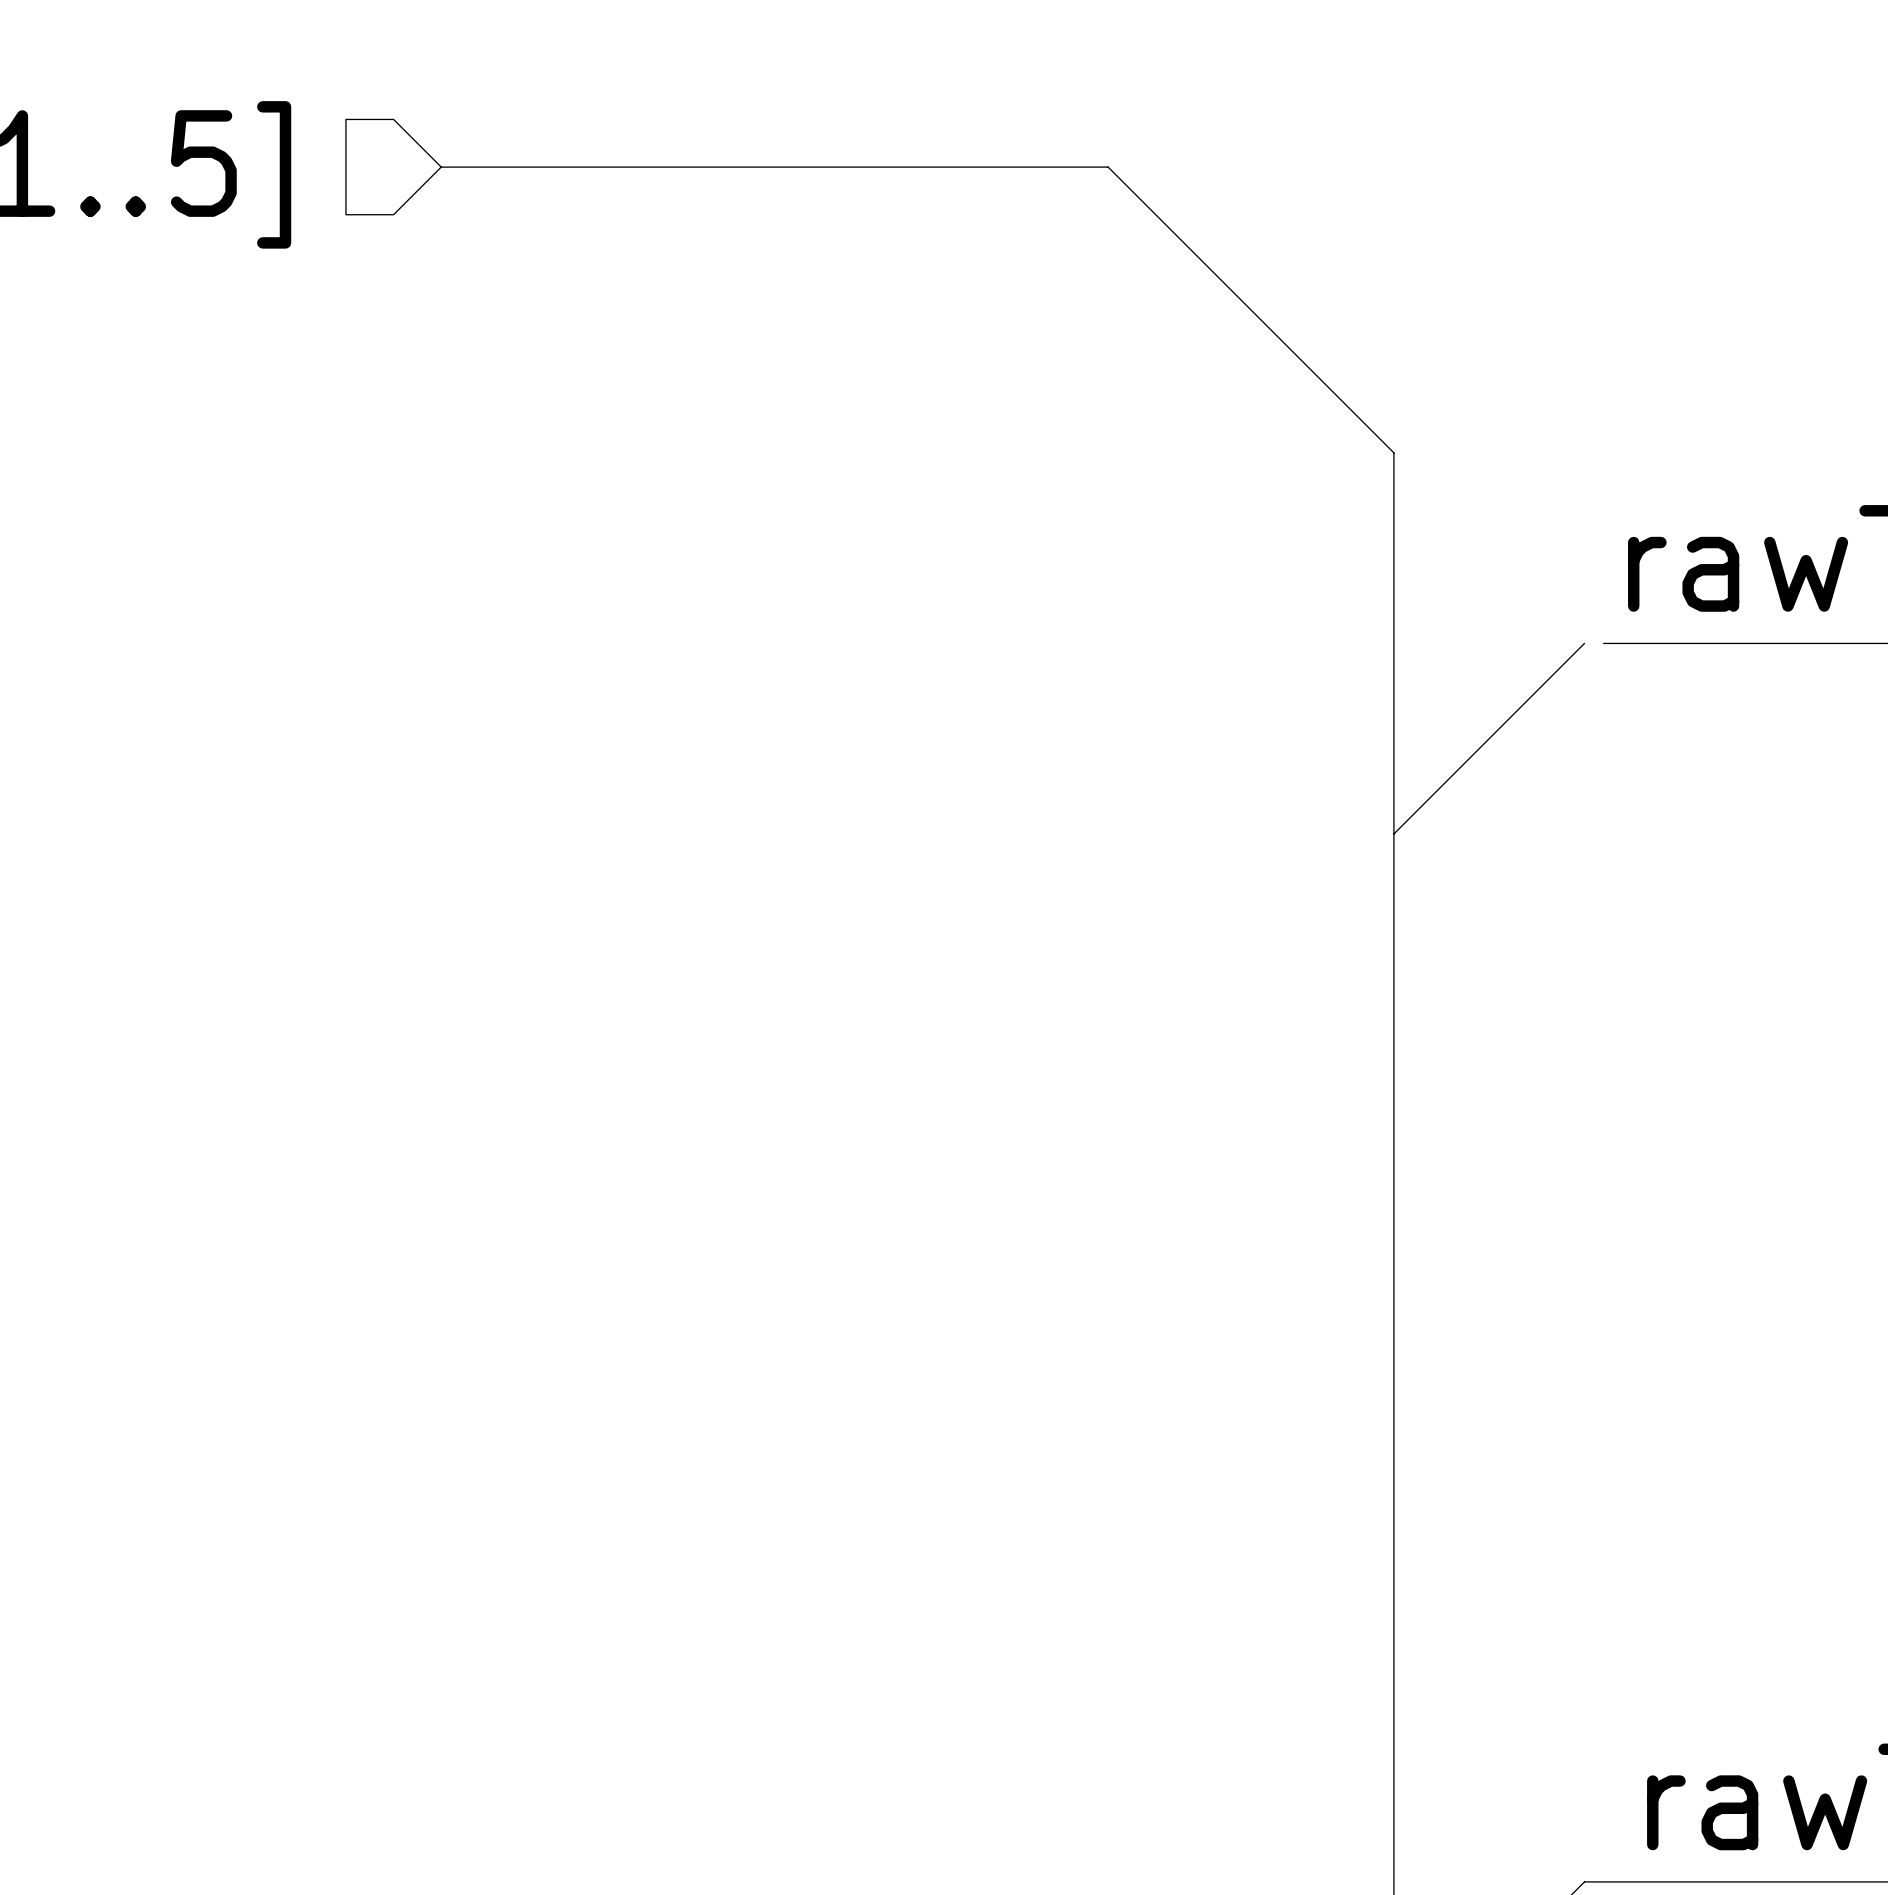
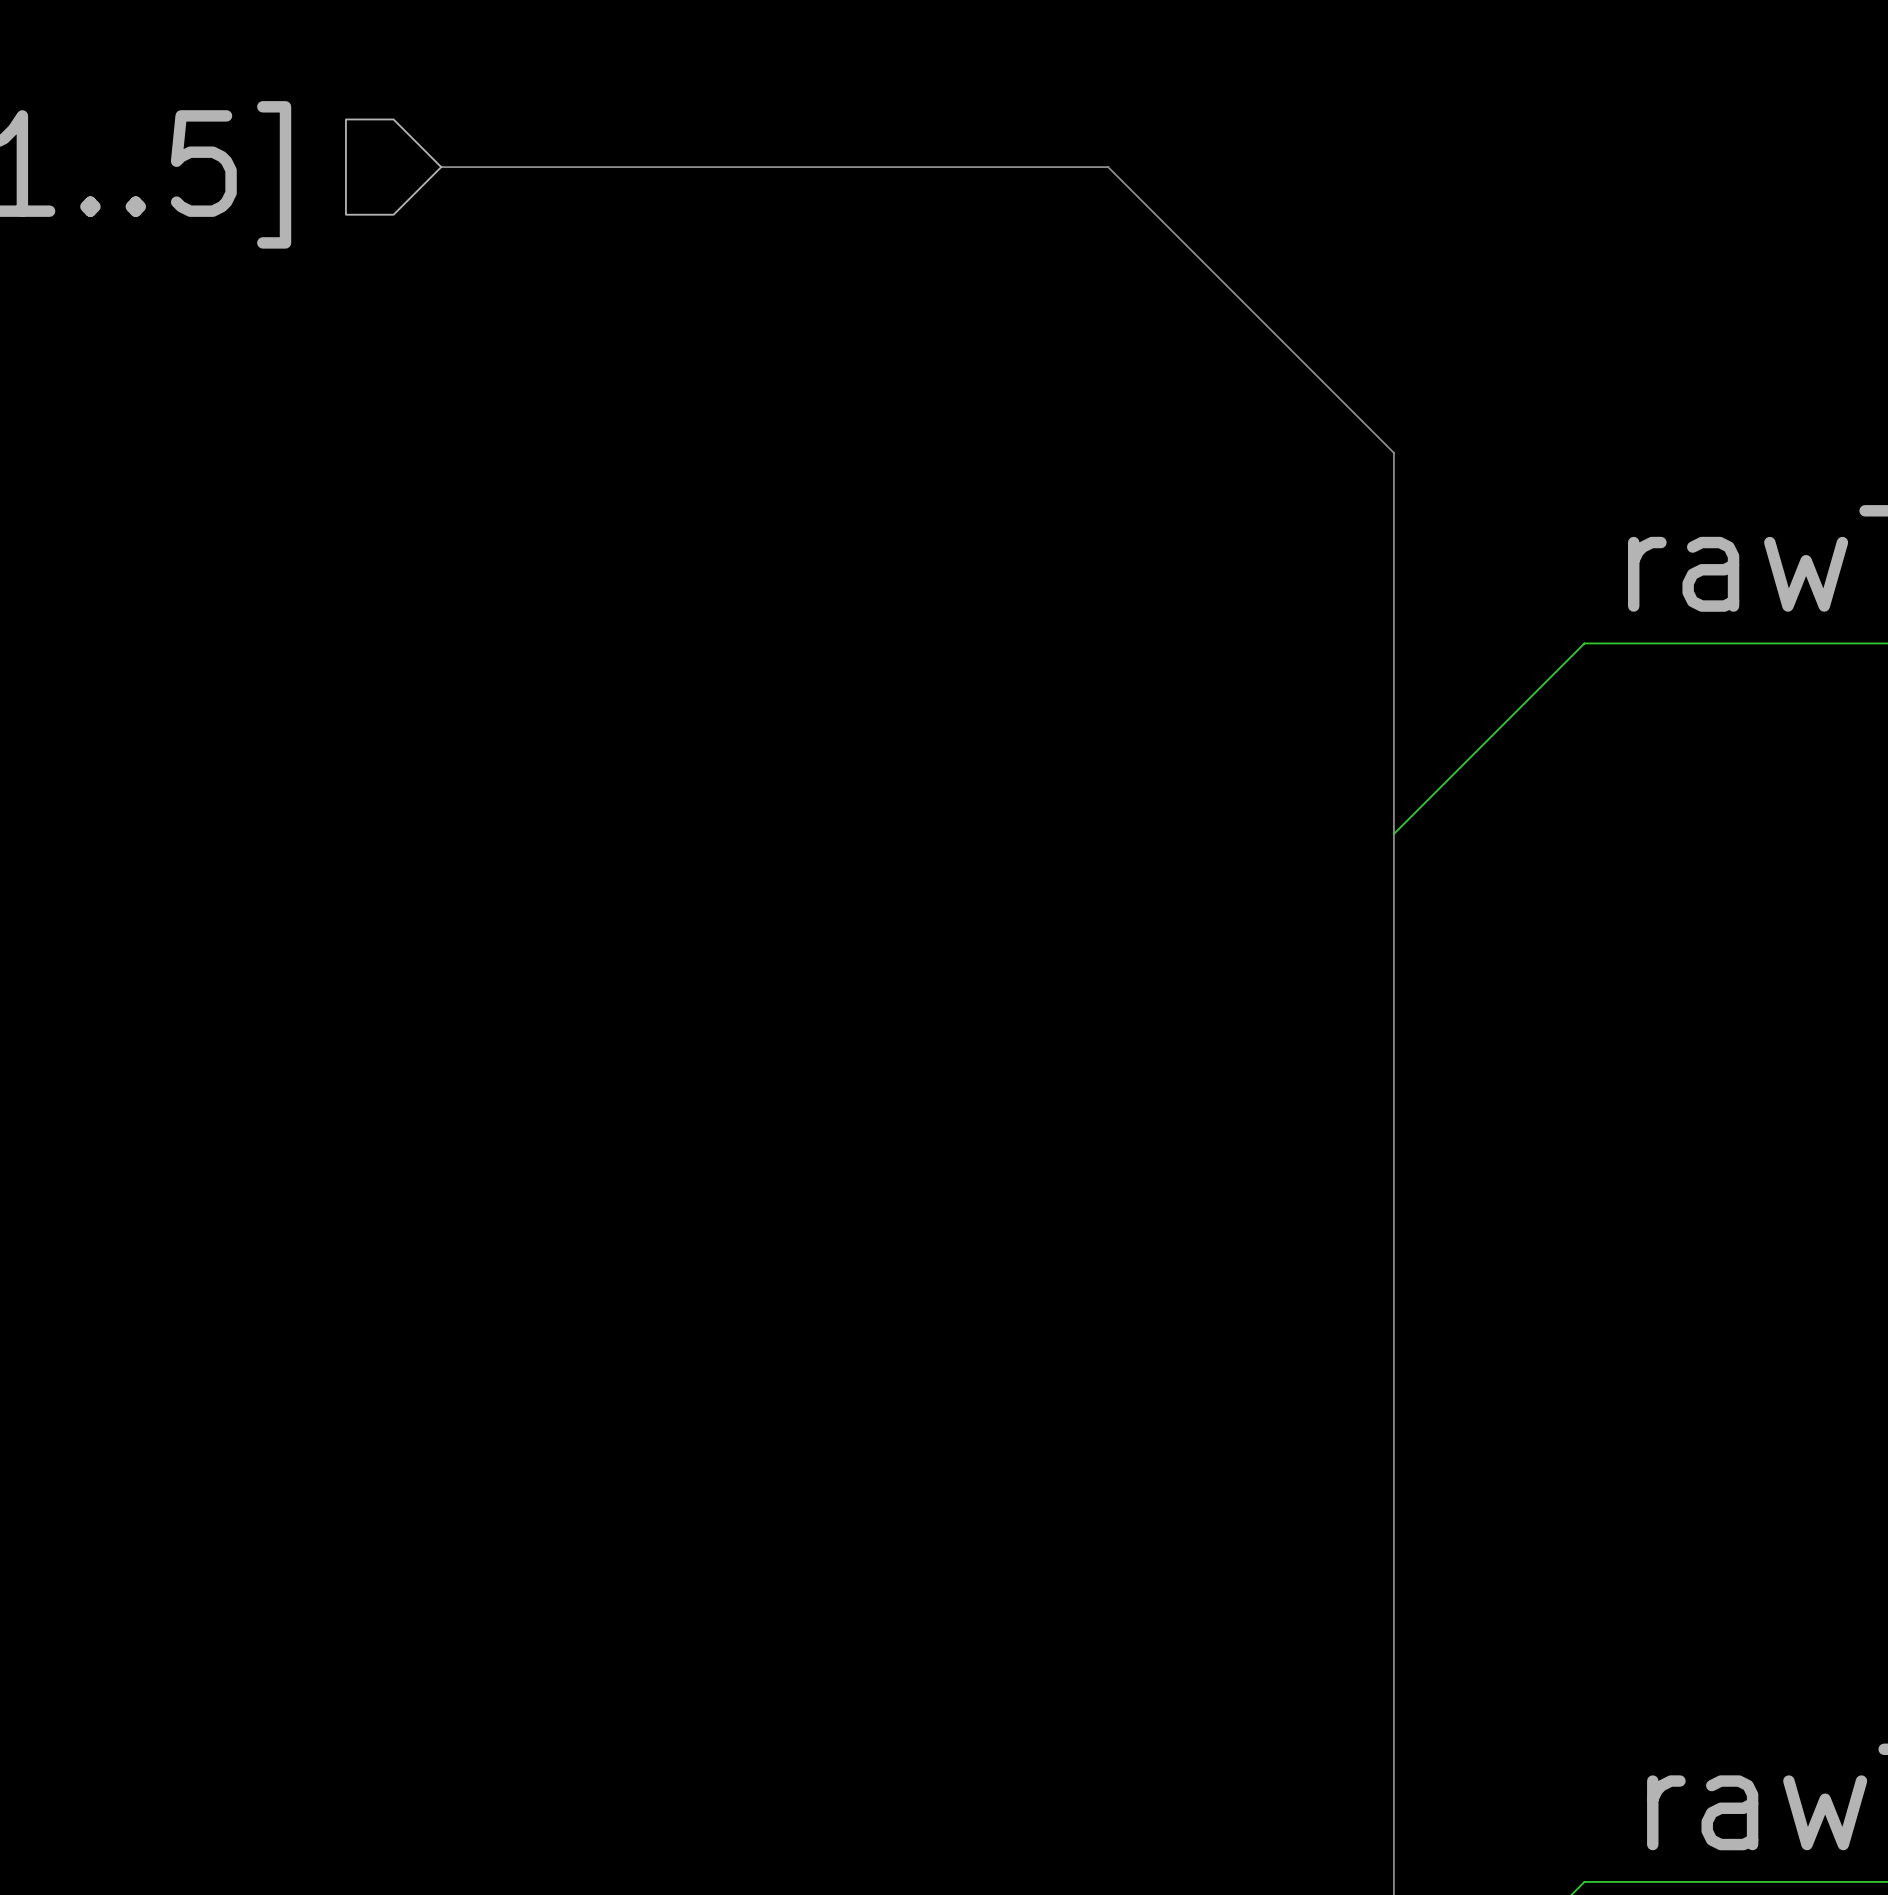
wire: none -> (1584, 643) (1603, 643)

